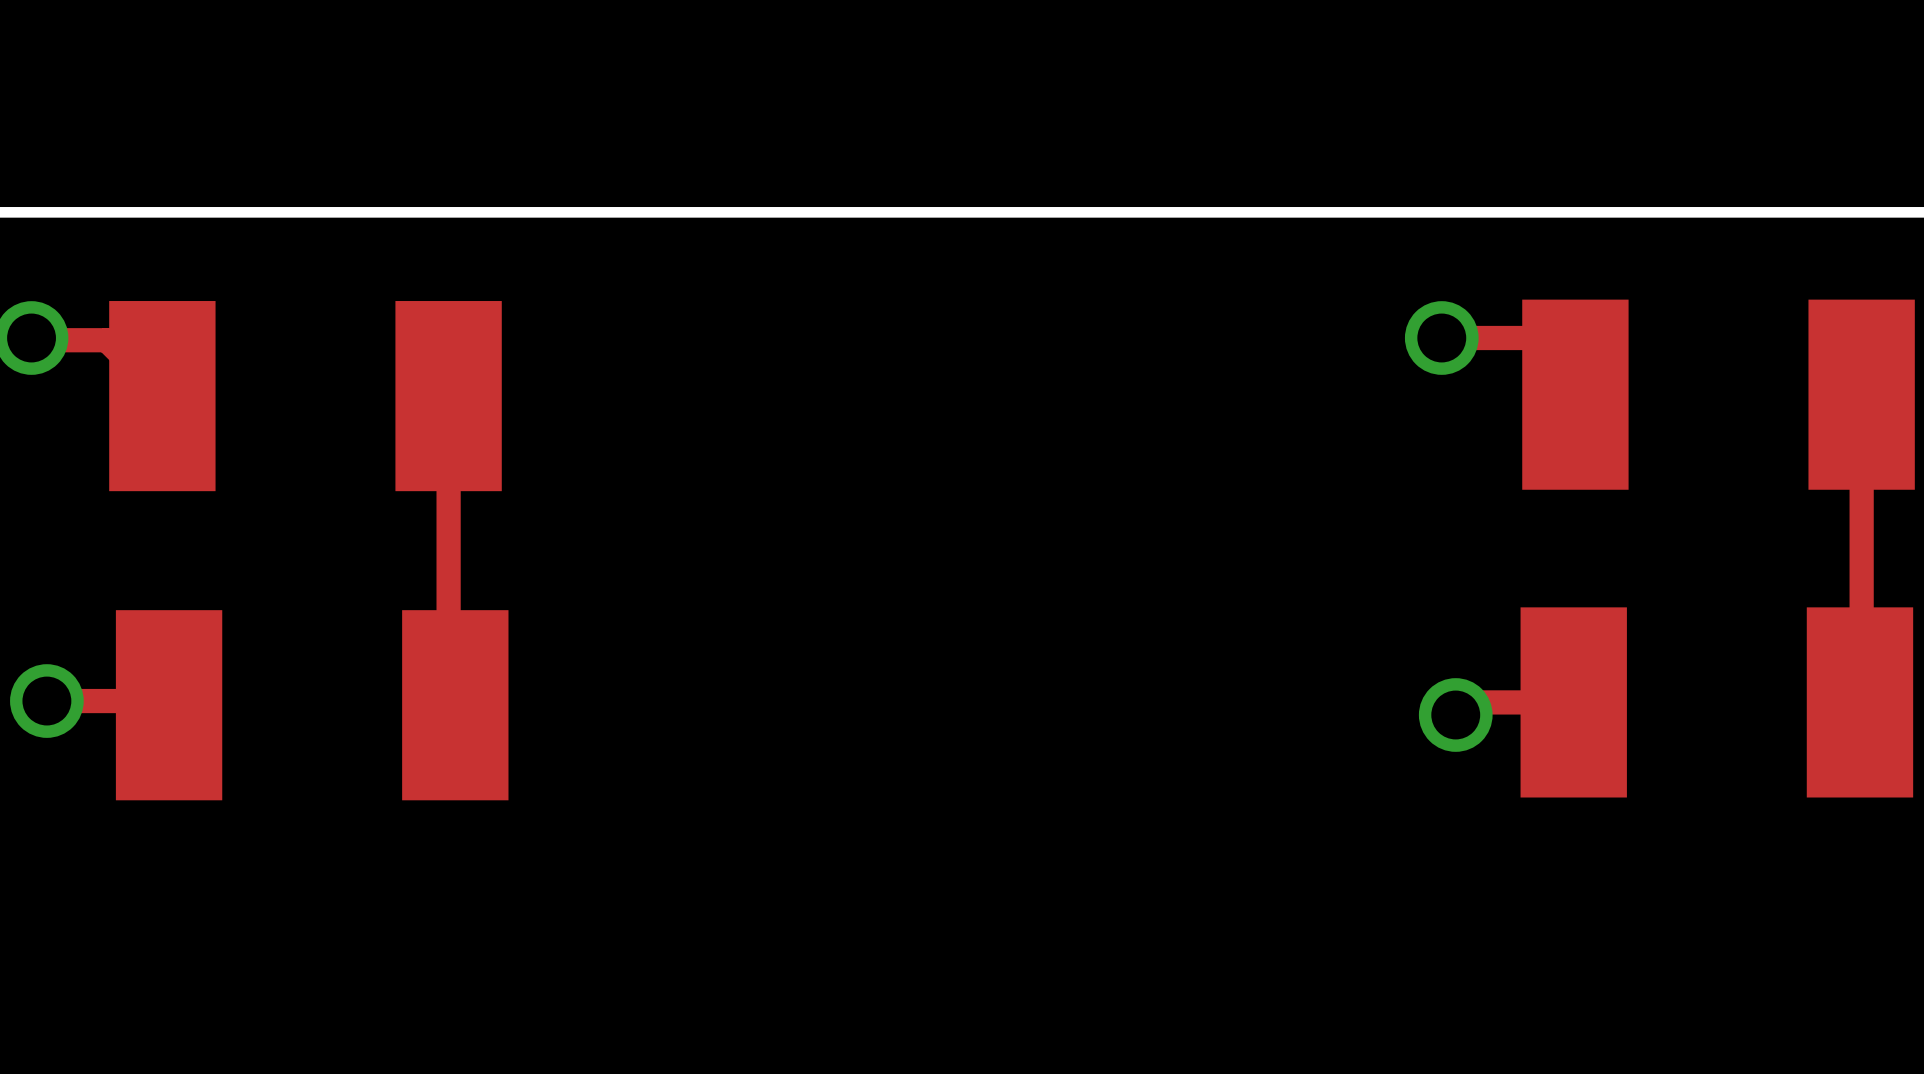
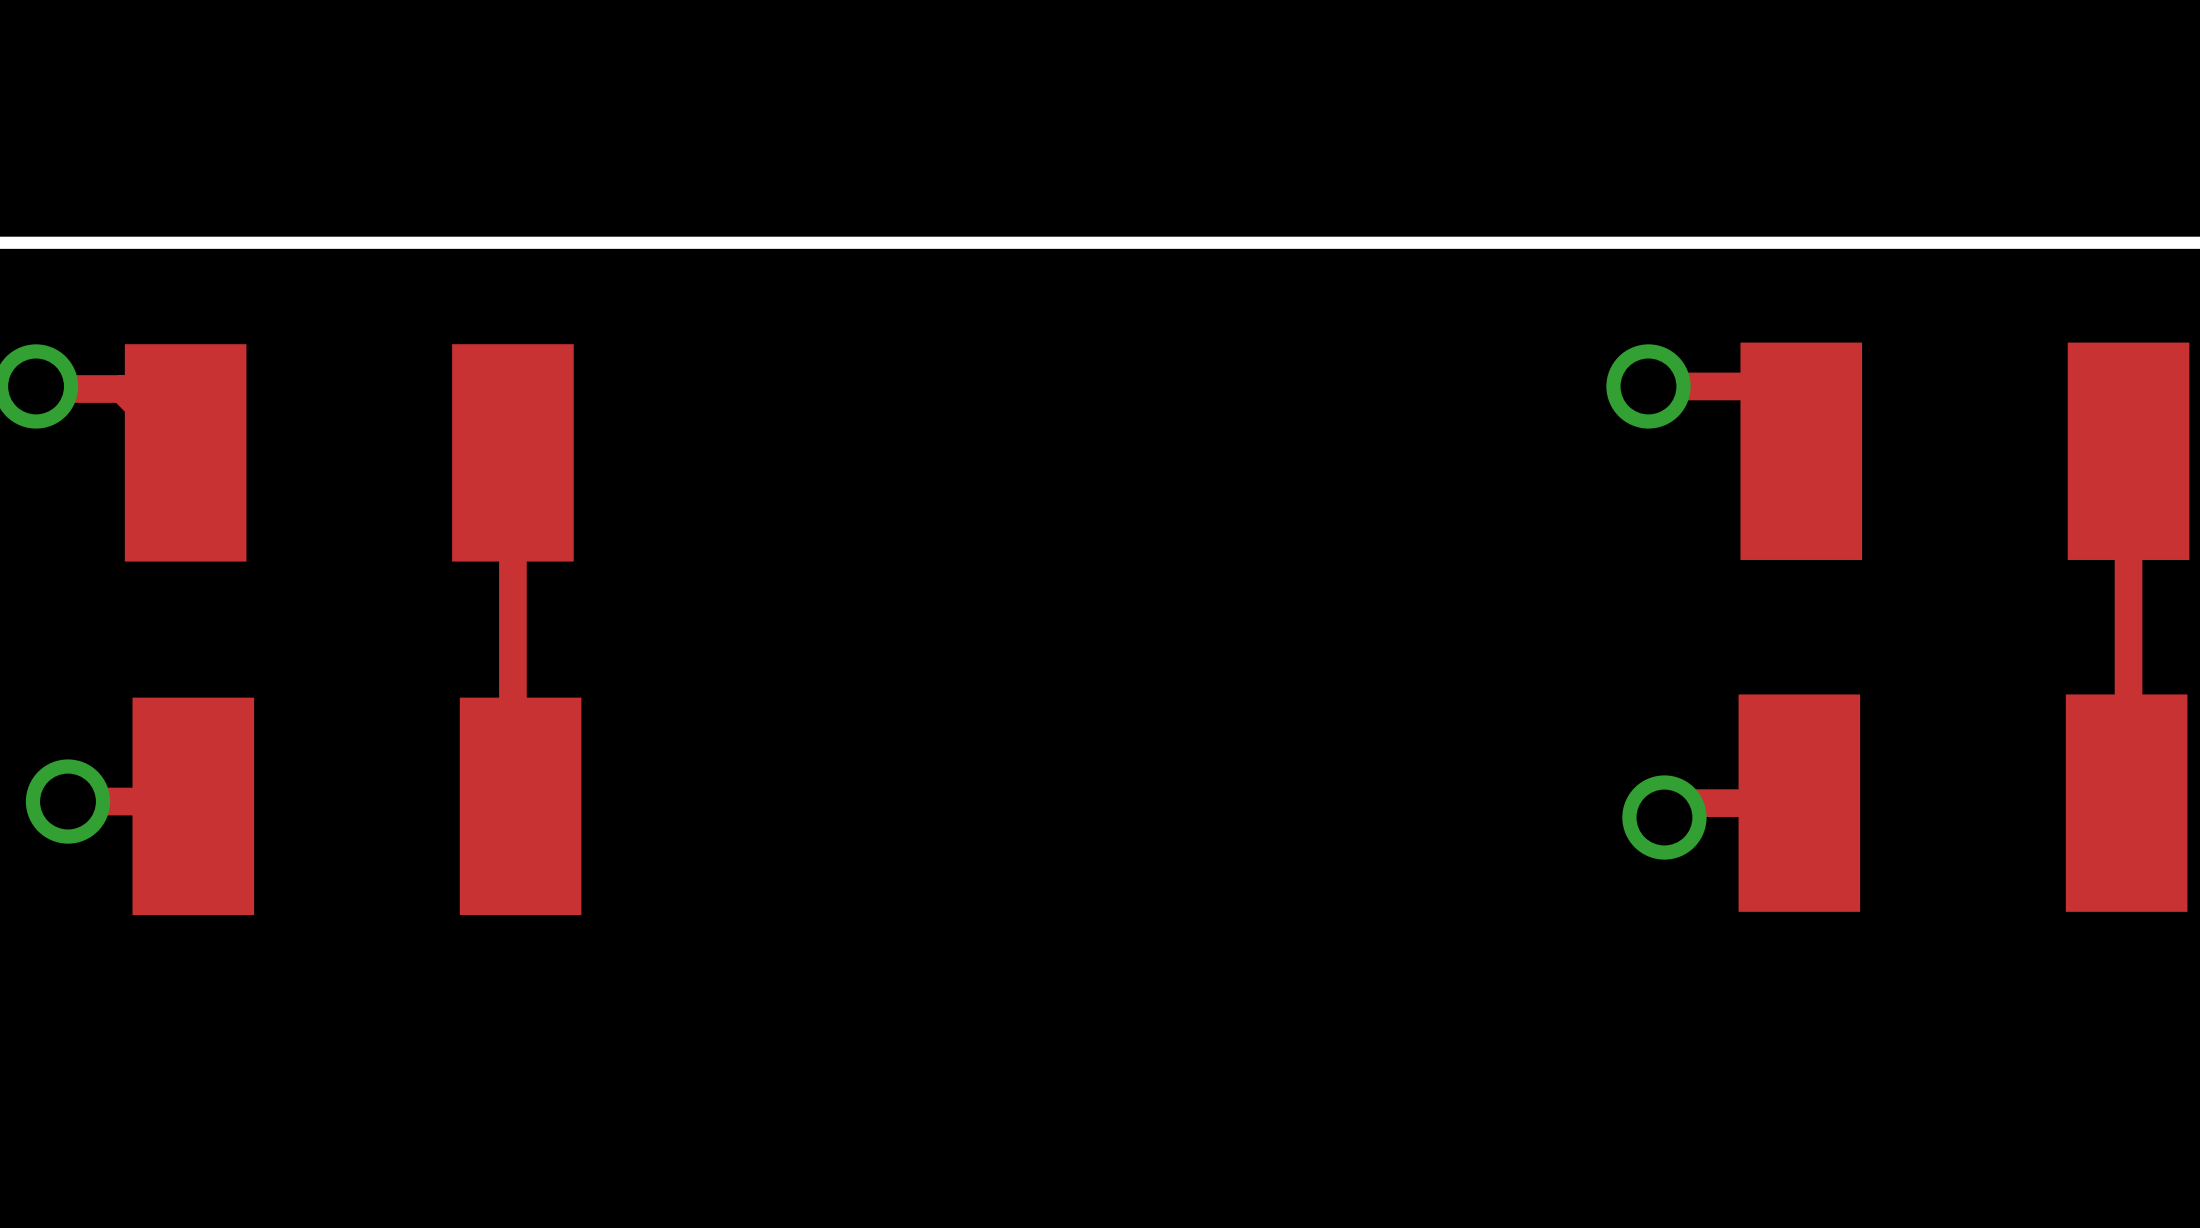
via position: (46, 701) -> (67, 801)

